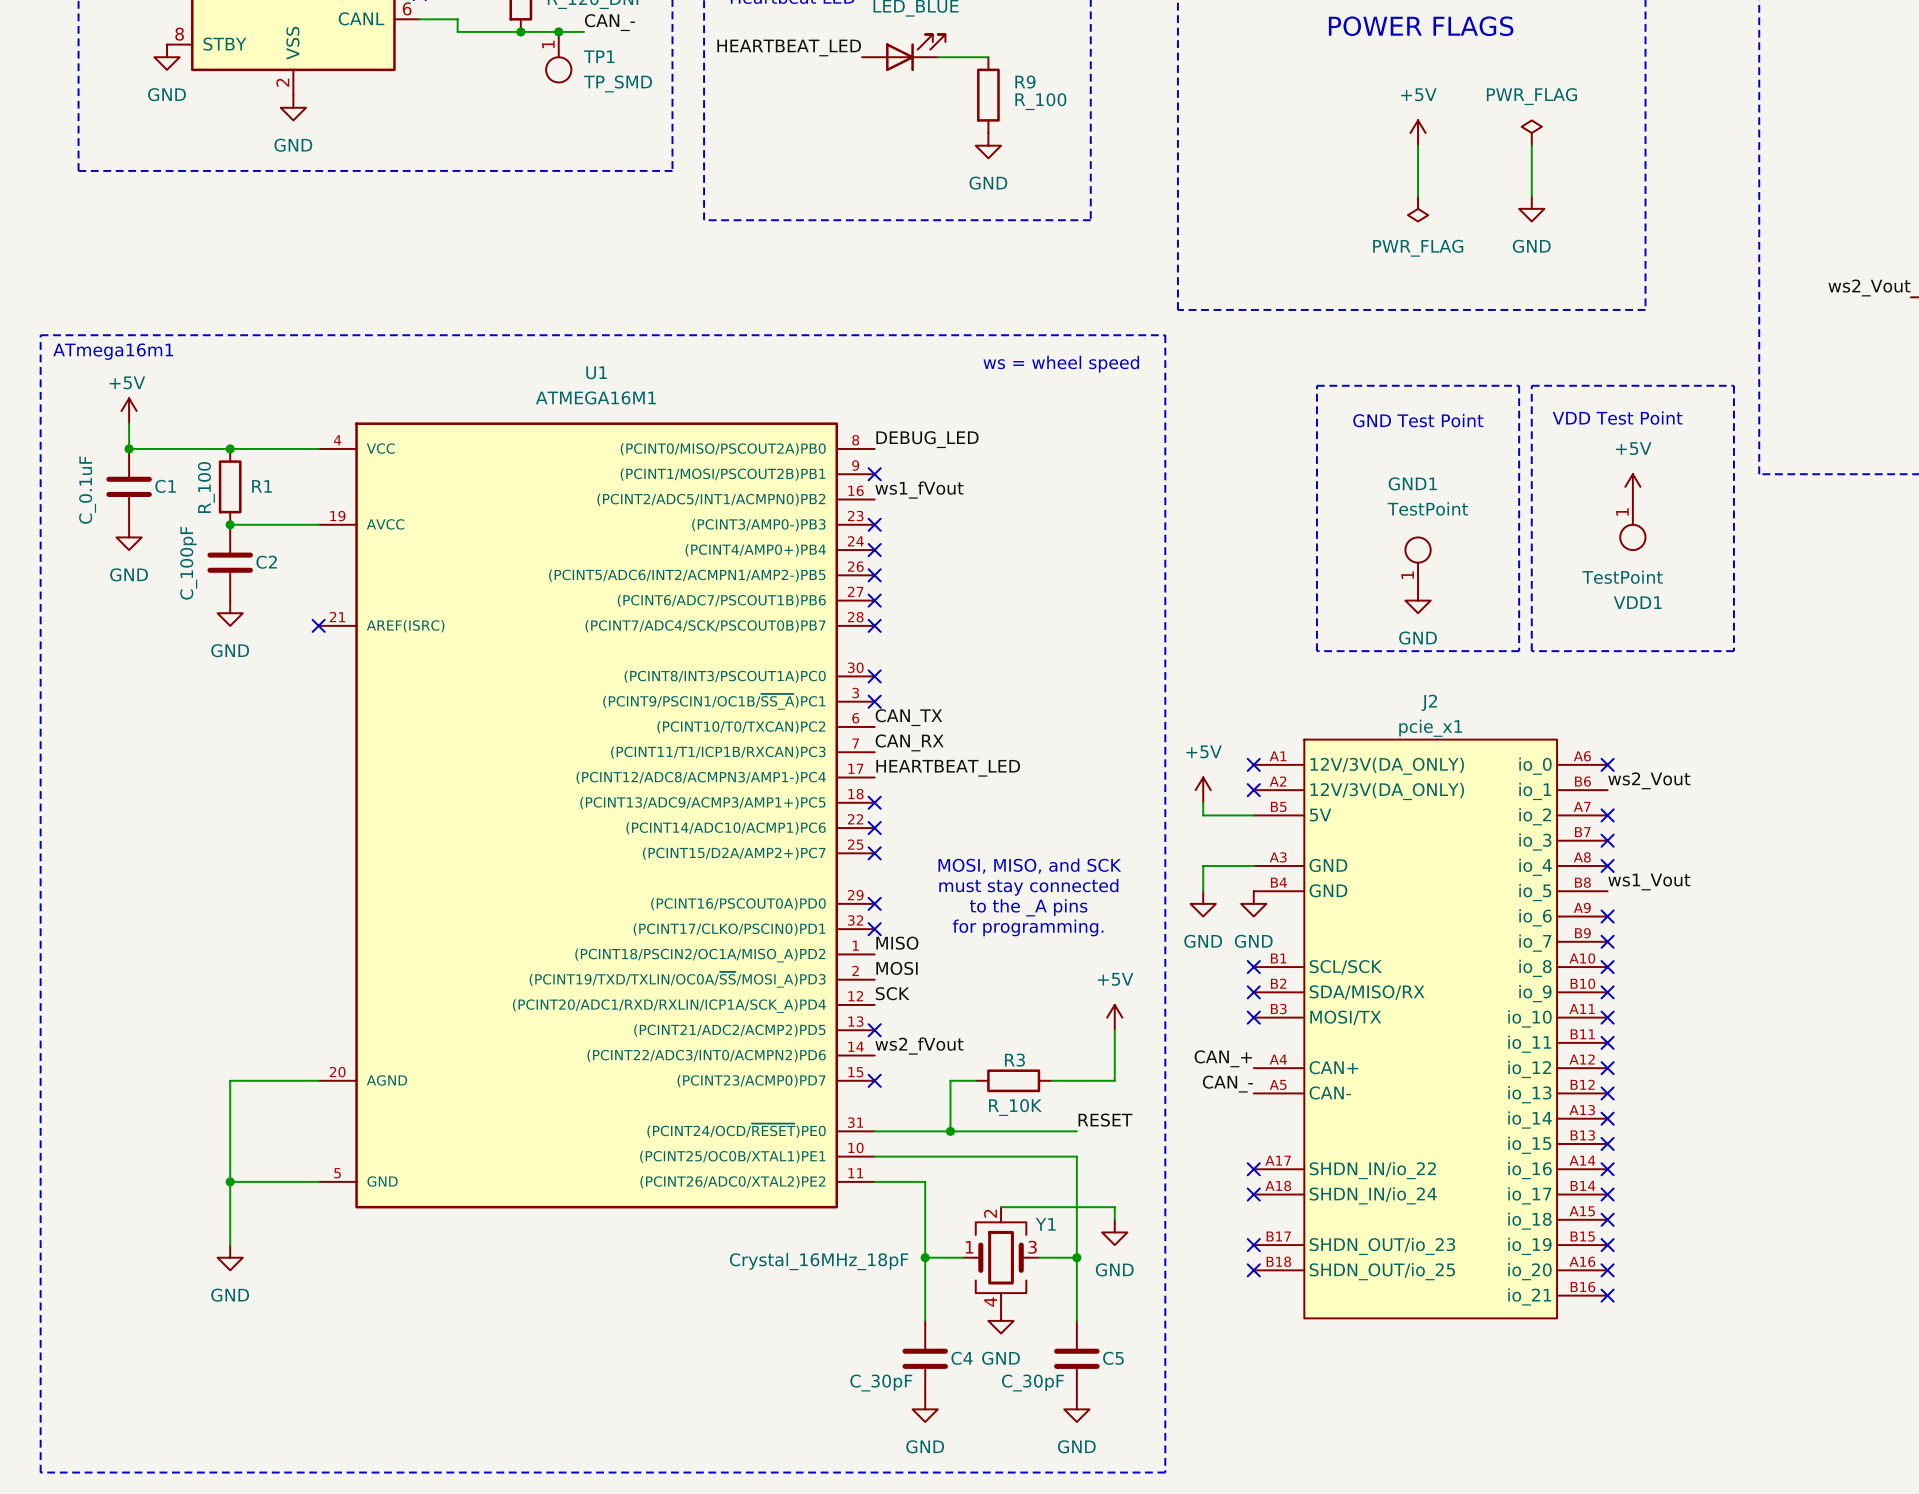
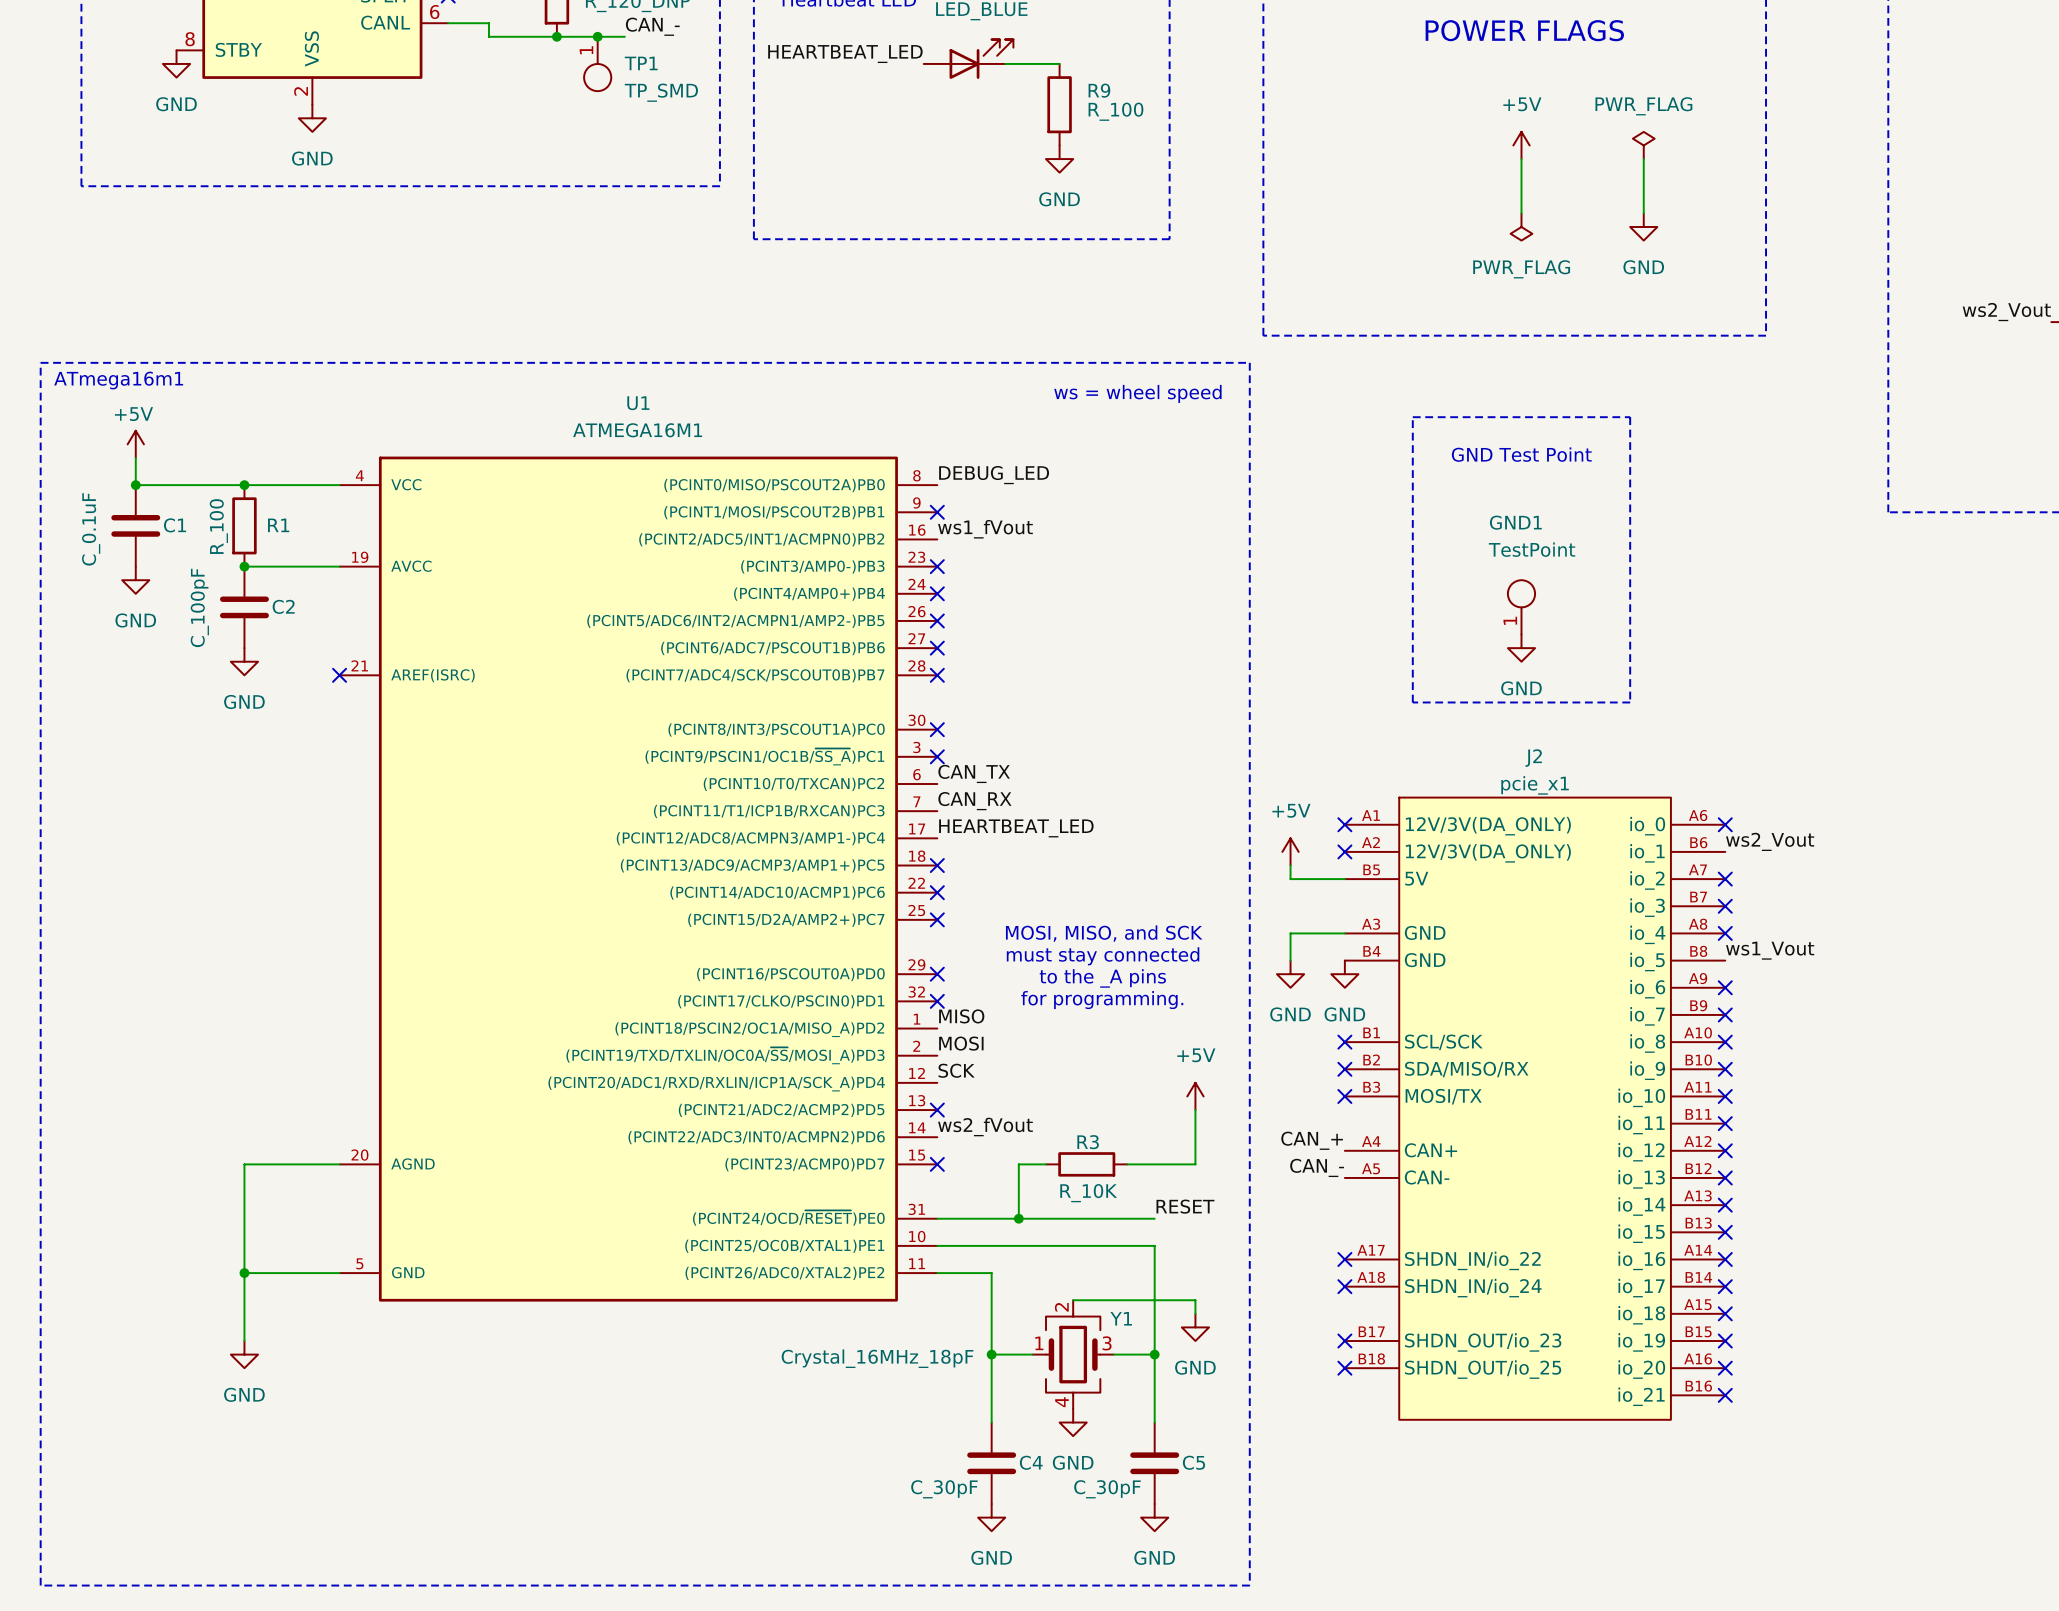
line: (1531, 385) (1733, 385) (1733, 651) (1531, 651) (1531, 385) -> none
text: VDD Test Point (1617, 418) -> none
power symbol: +5V (1632, 486) -> none
VDD1: TestPoint (1632, 524) -> none

